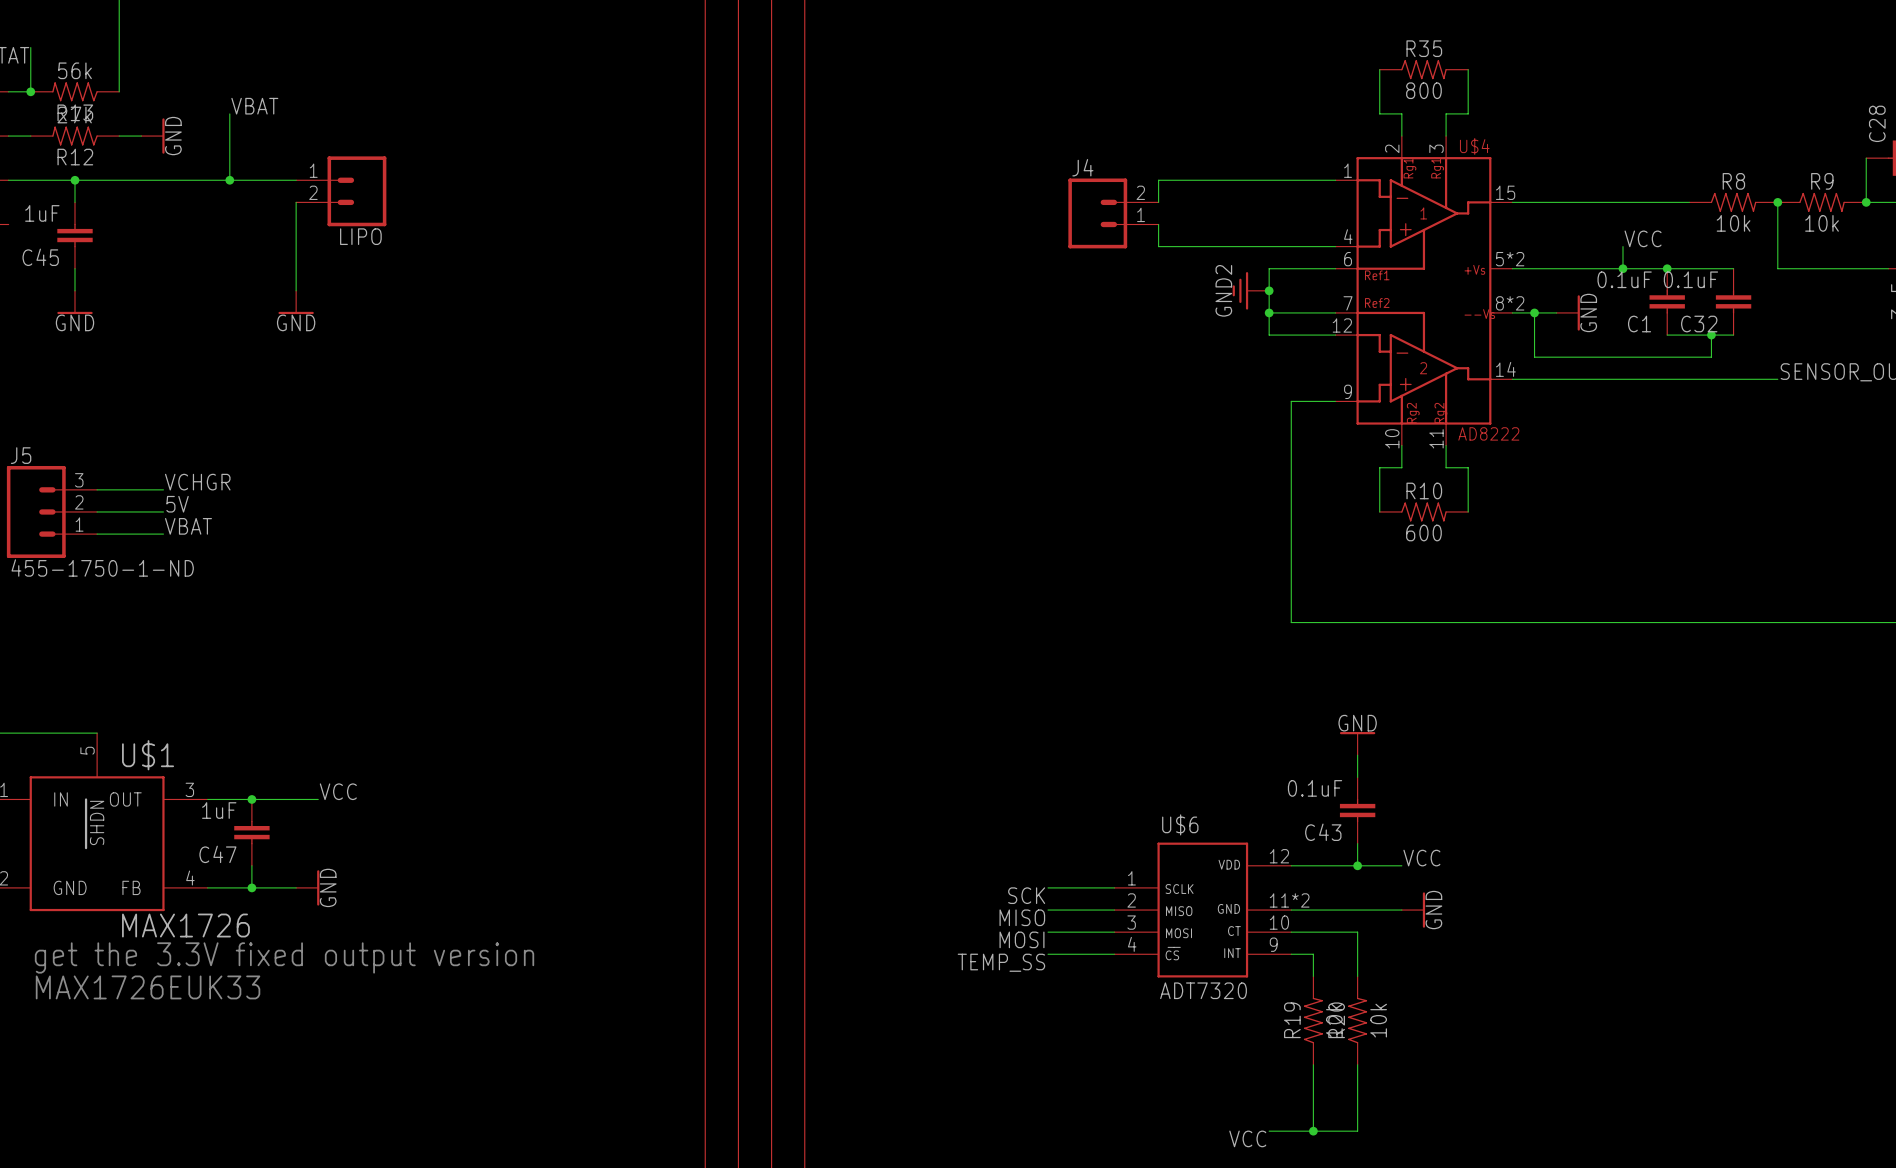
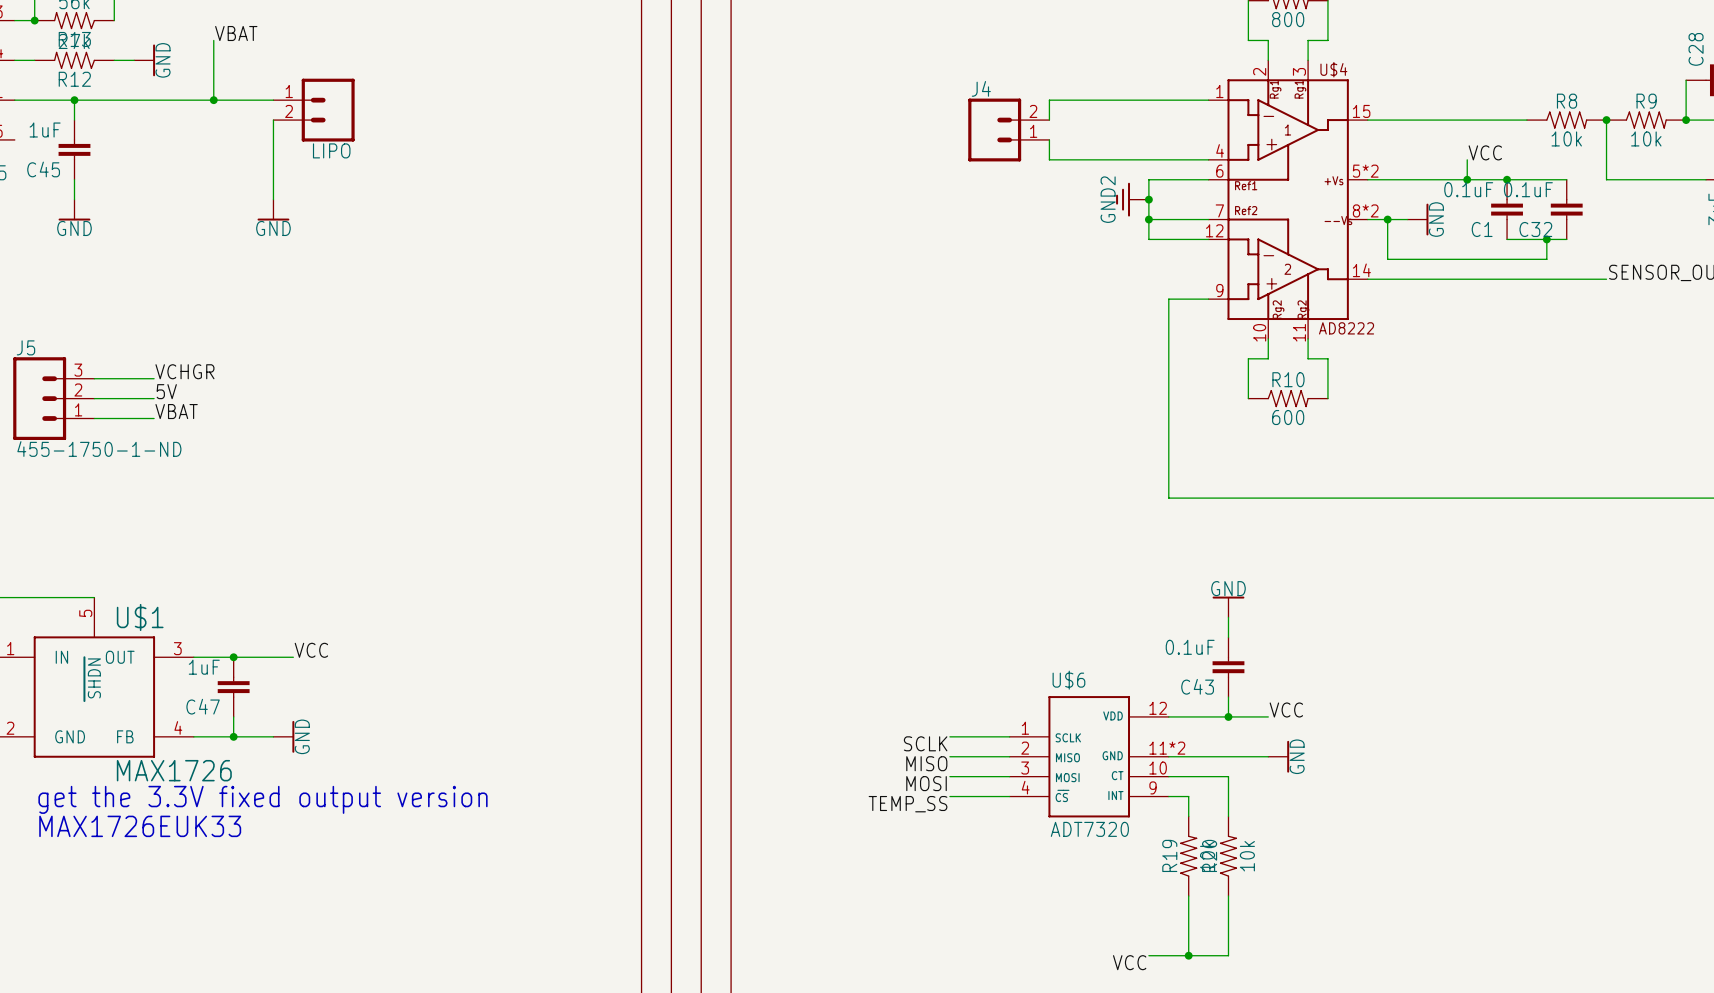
label: SCK (1026, 895) -> SCLK (925, 743)

